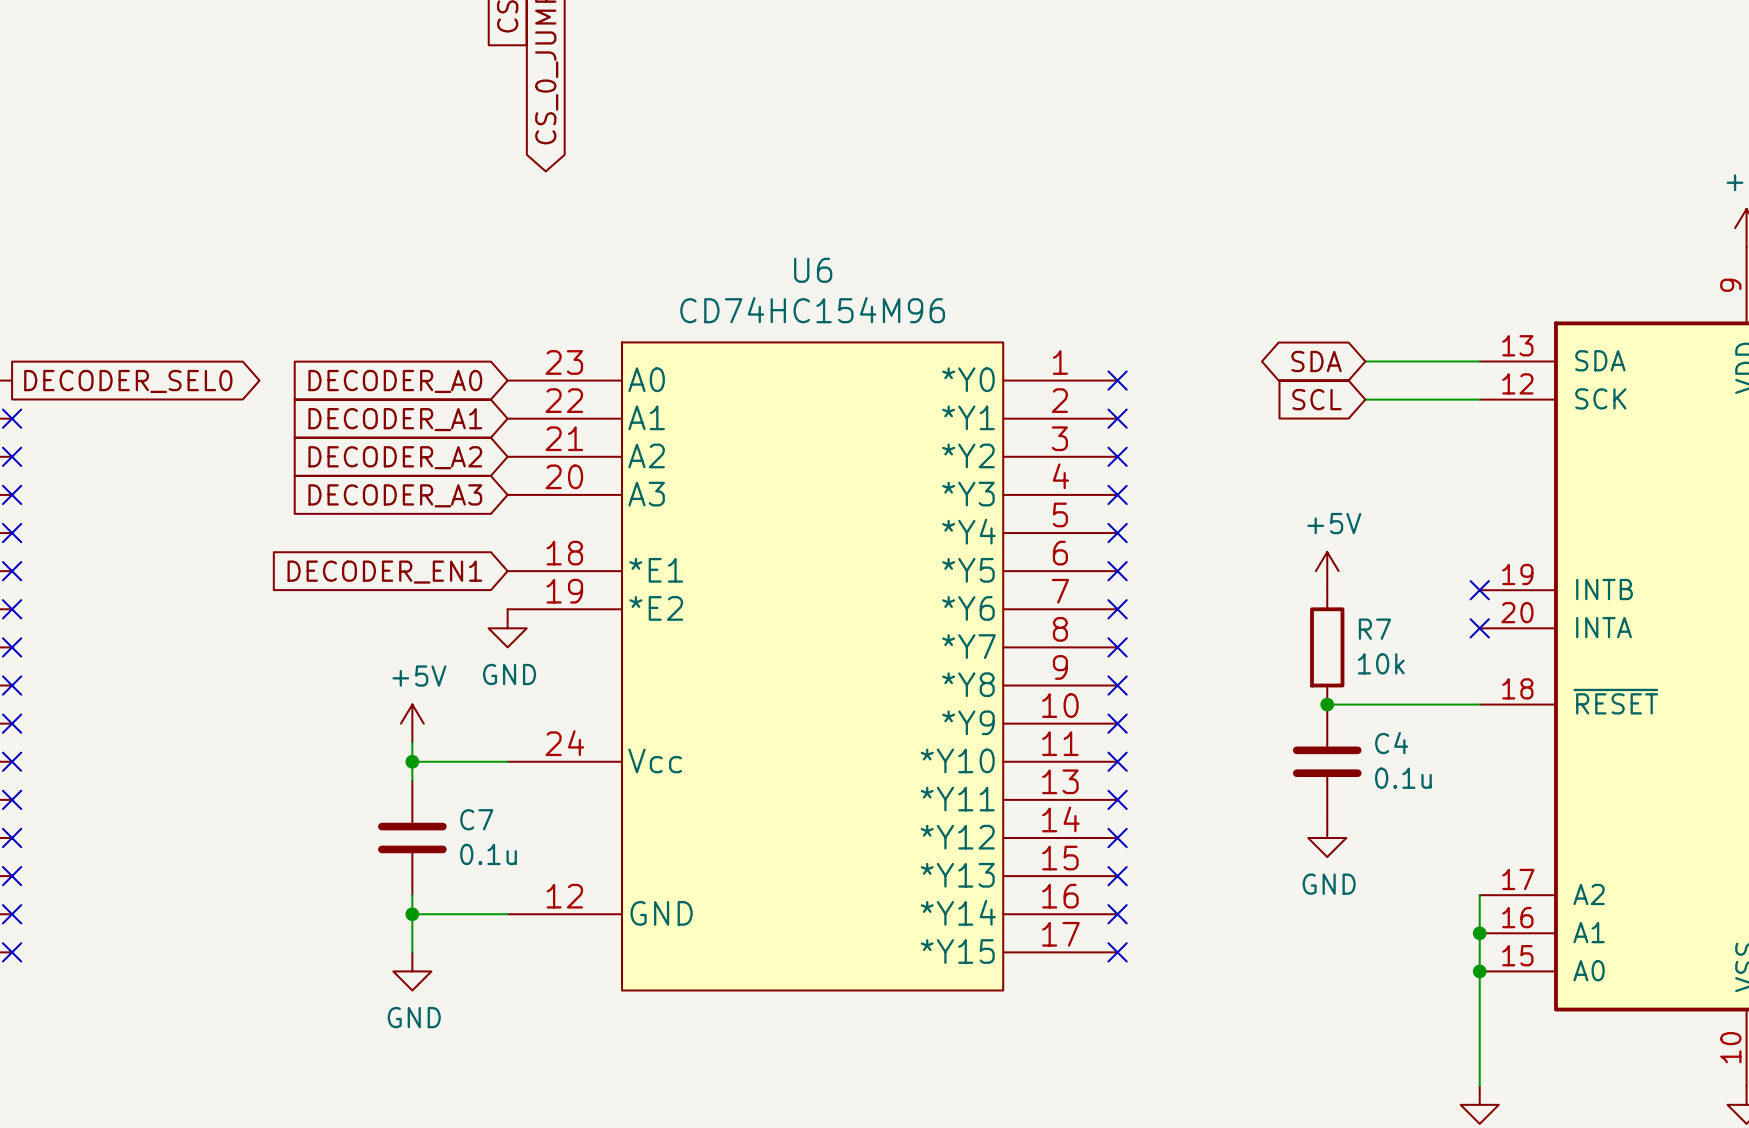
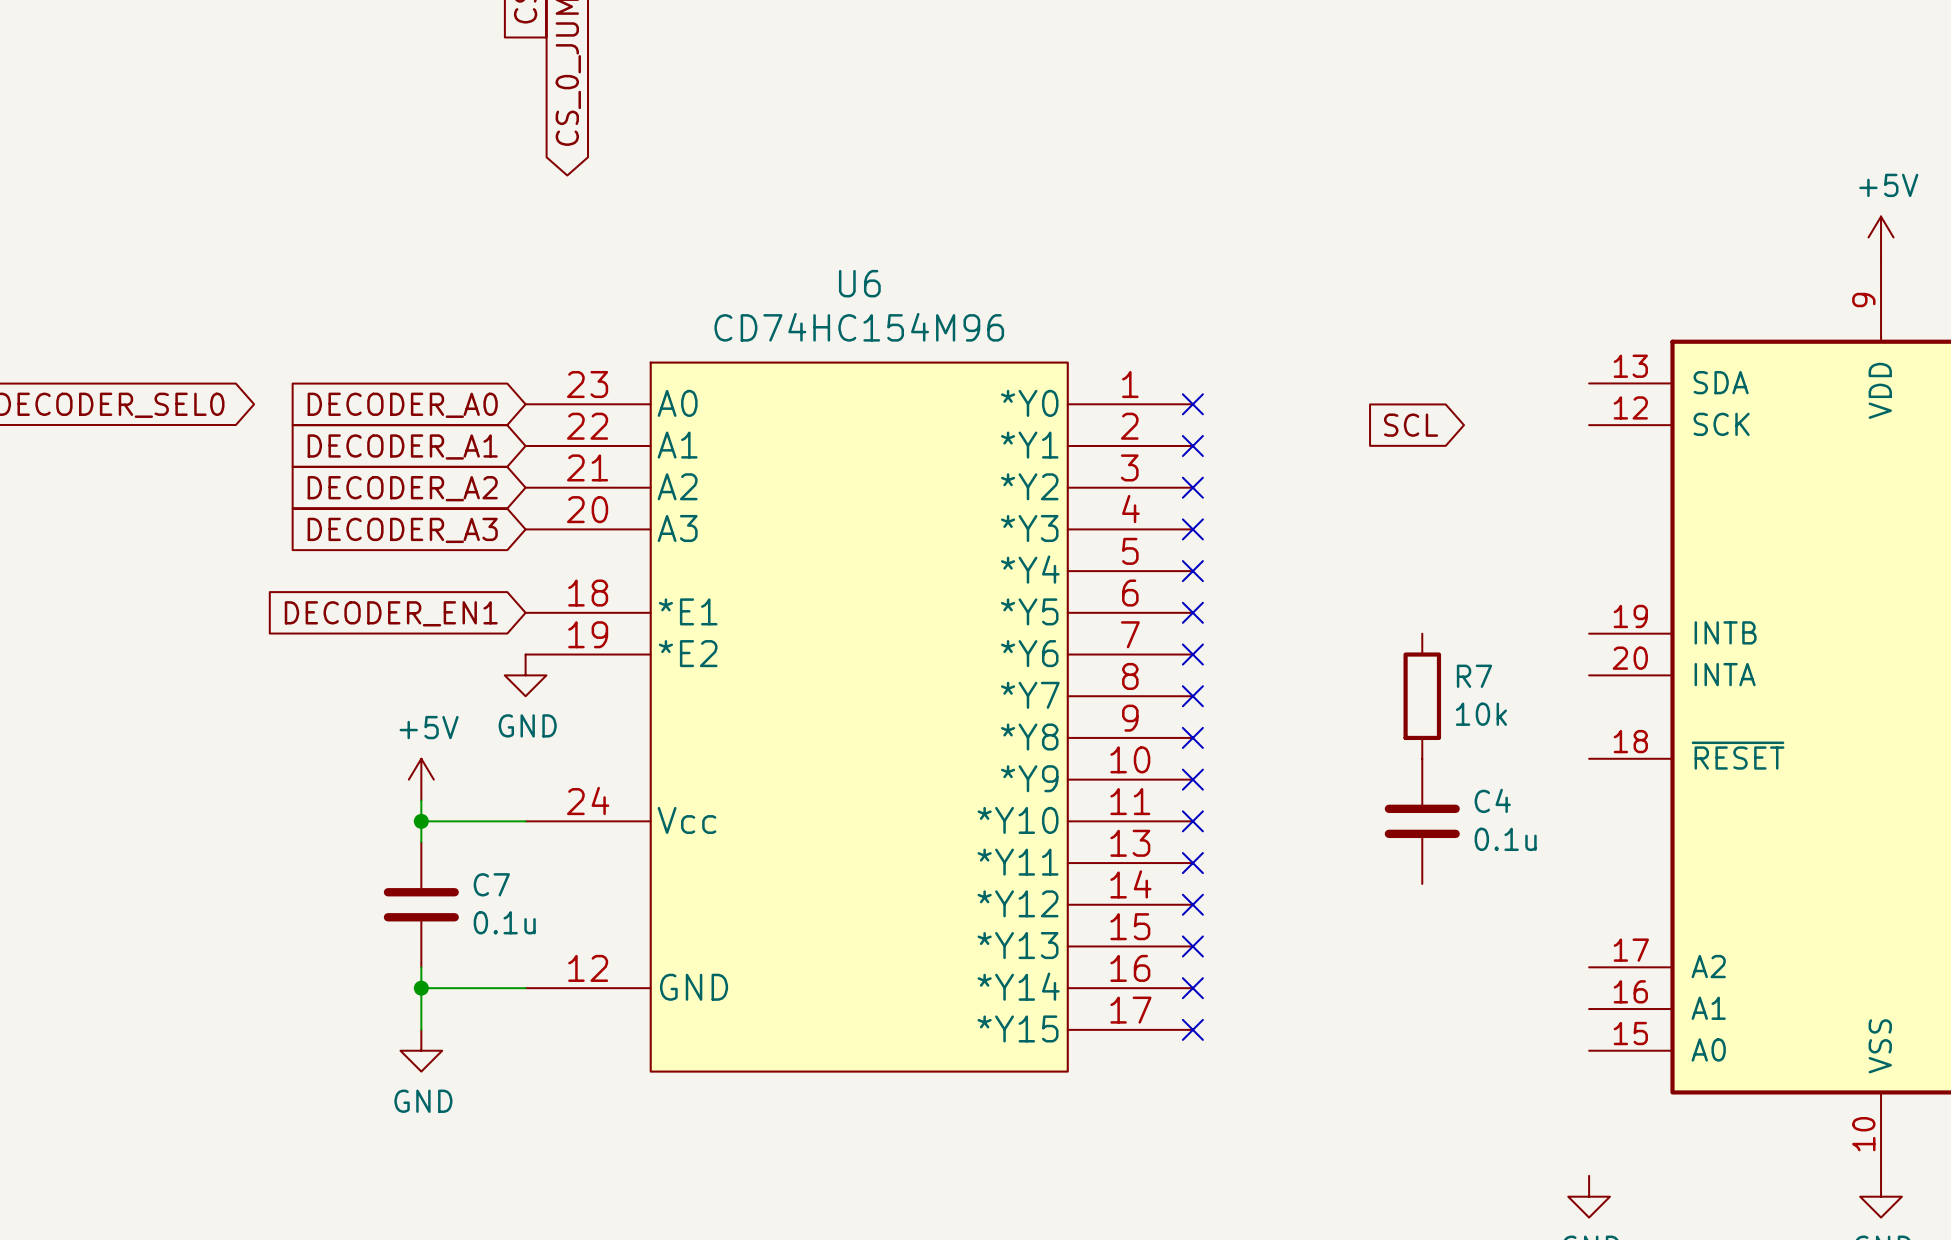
global label: SDA (1316, 361) -> none
wire: (1365, 361) (1479, 361) -> none
wire: (1365, 399) (1479, 399) -> none
power symbol: +5V (1327, 571) -> none
no-connect mark: (1479, 590) -> none
no-connect mark: (1479, 628) -> none
wire: (1327, 704) (1479, 704) -> none
junction: (1327, 704) -> none
power symbol: GND (1327, 838) -> none
wire: (1479, 895) (1479, 1085) -> none
junction: (1479, 933) -> none
junction: (1479, 971) -> none

